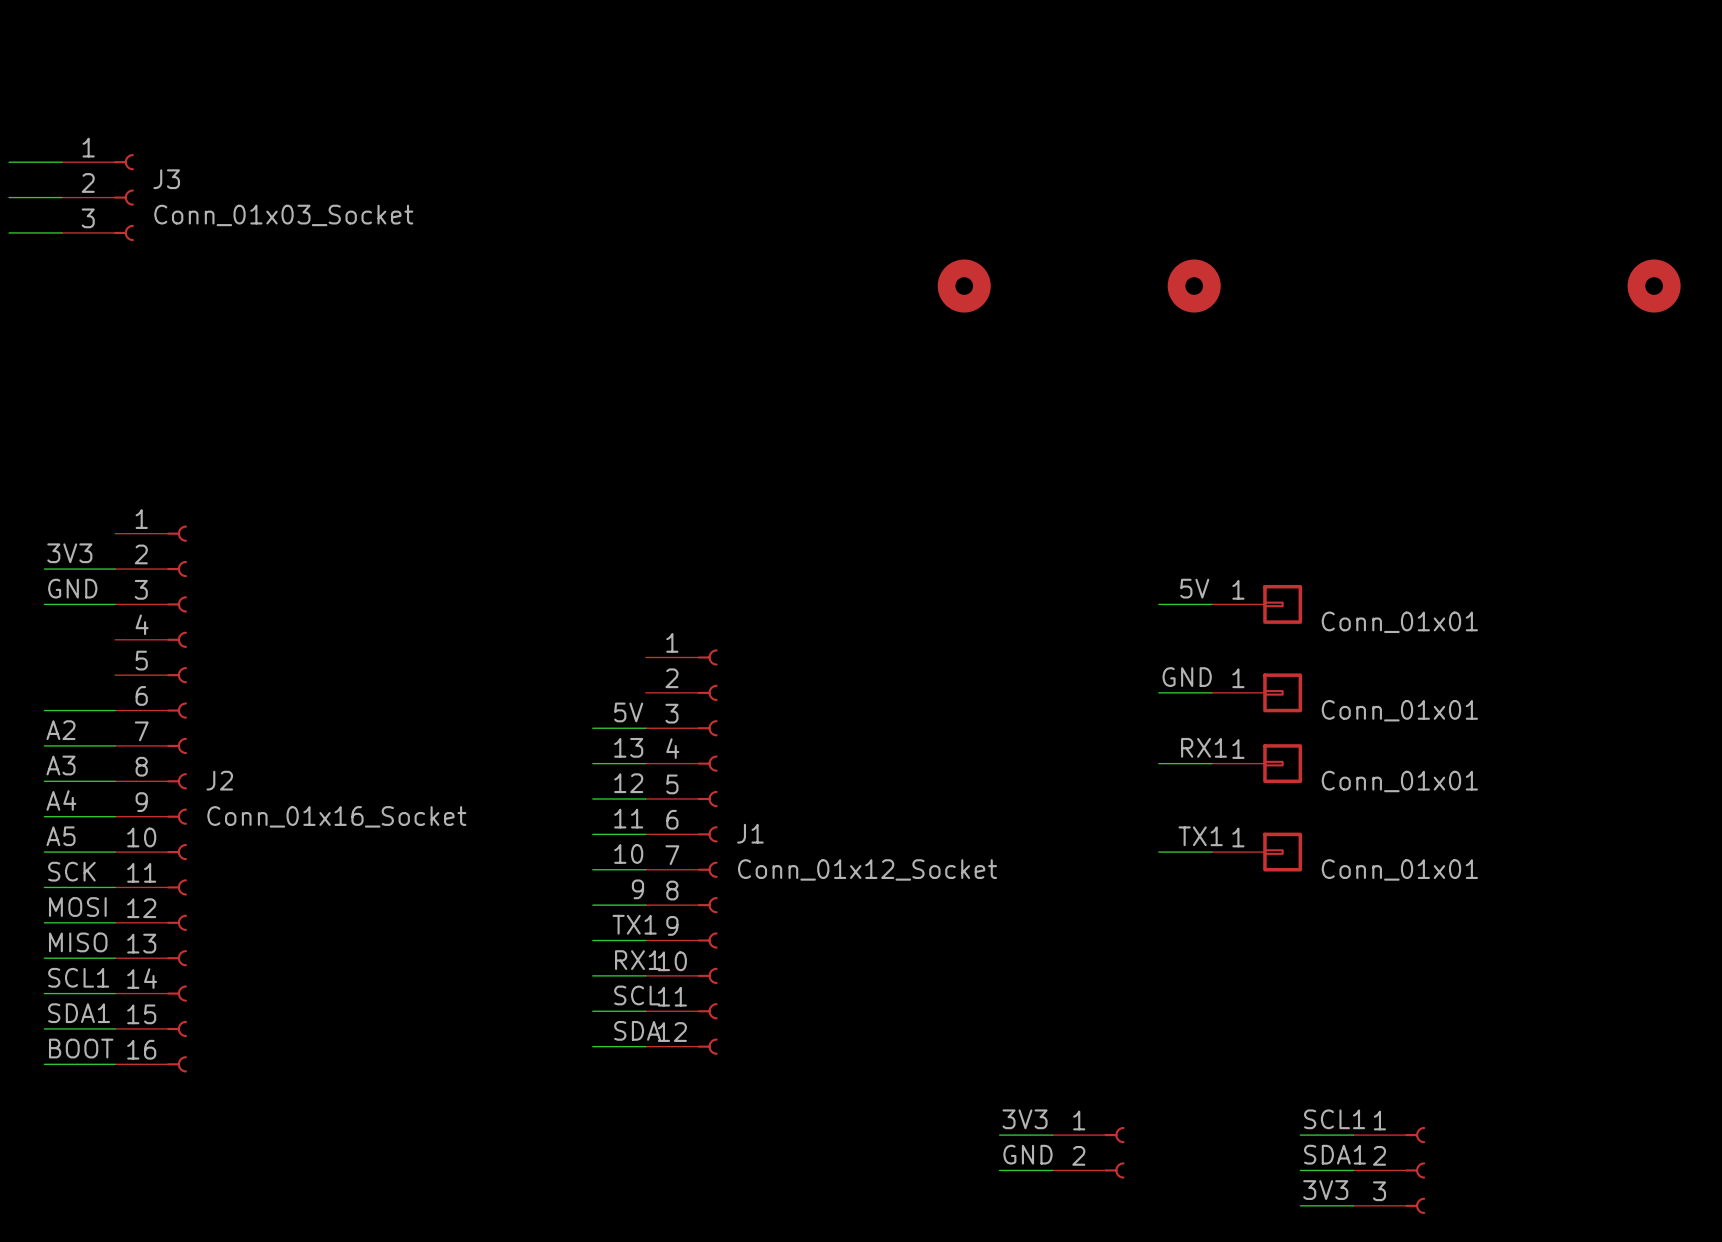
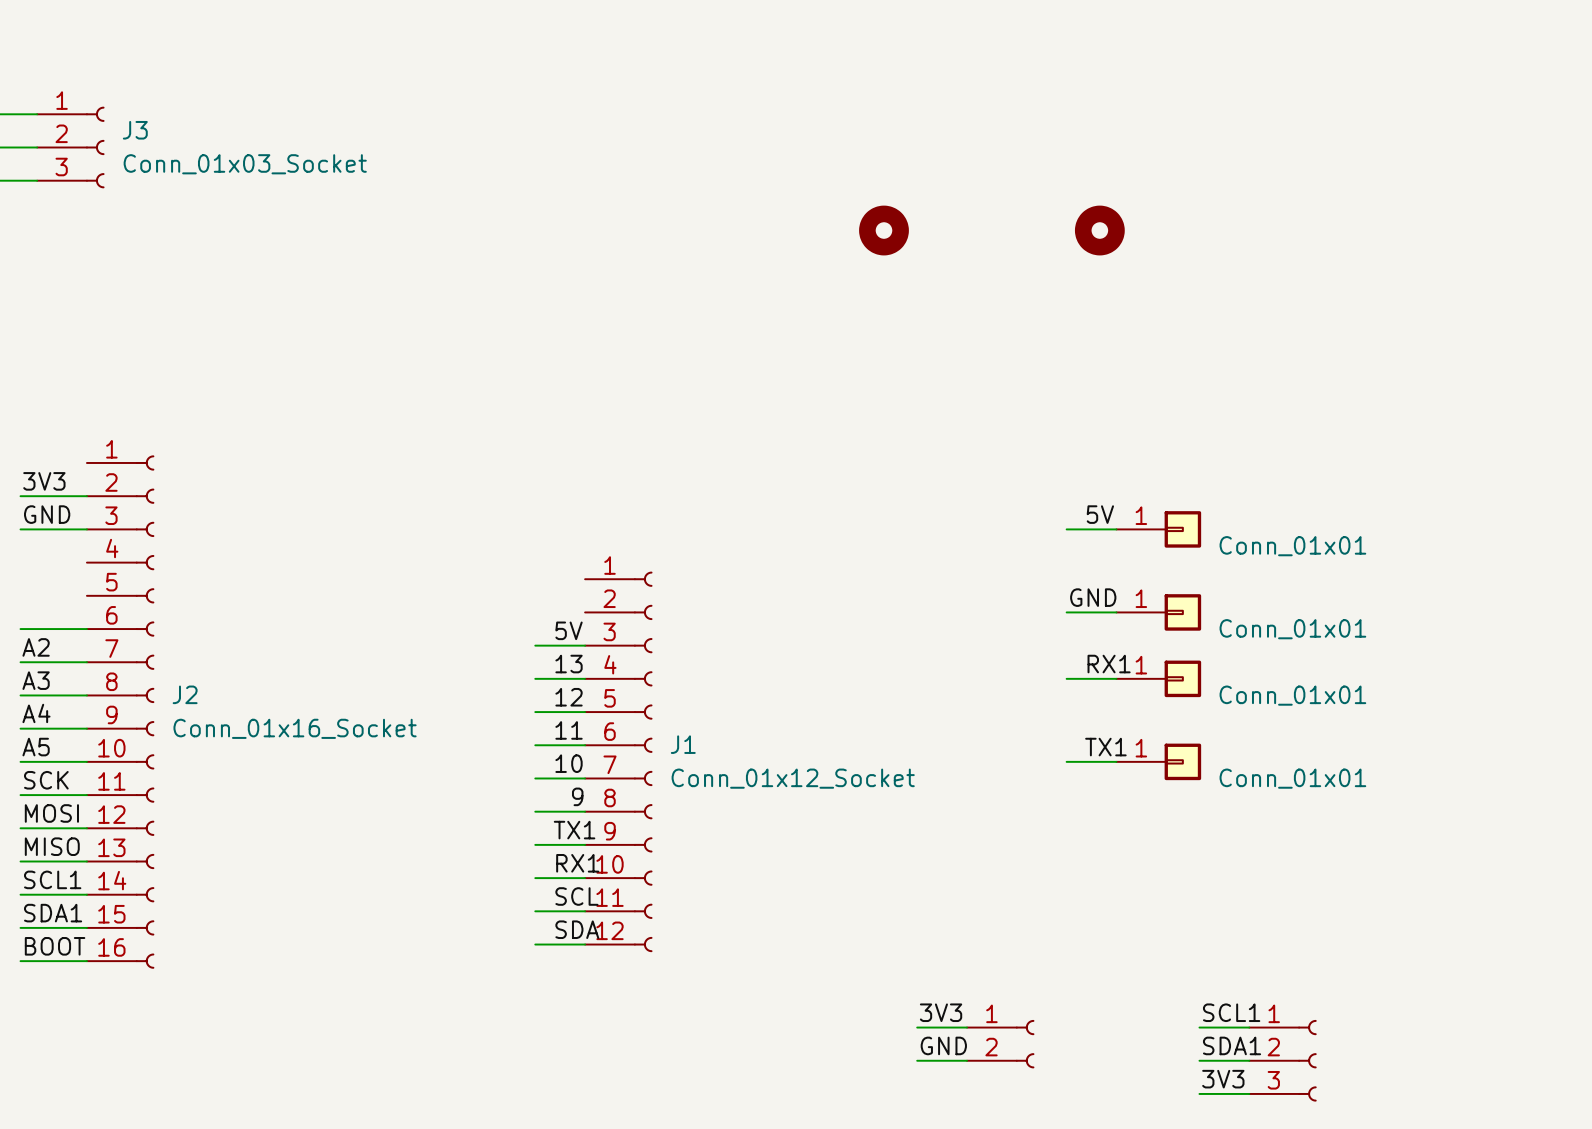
part: (1654, 286) -> none

